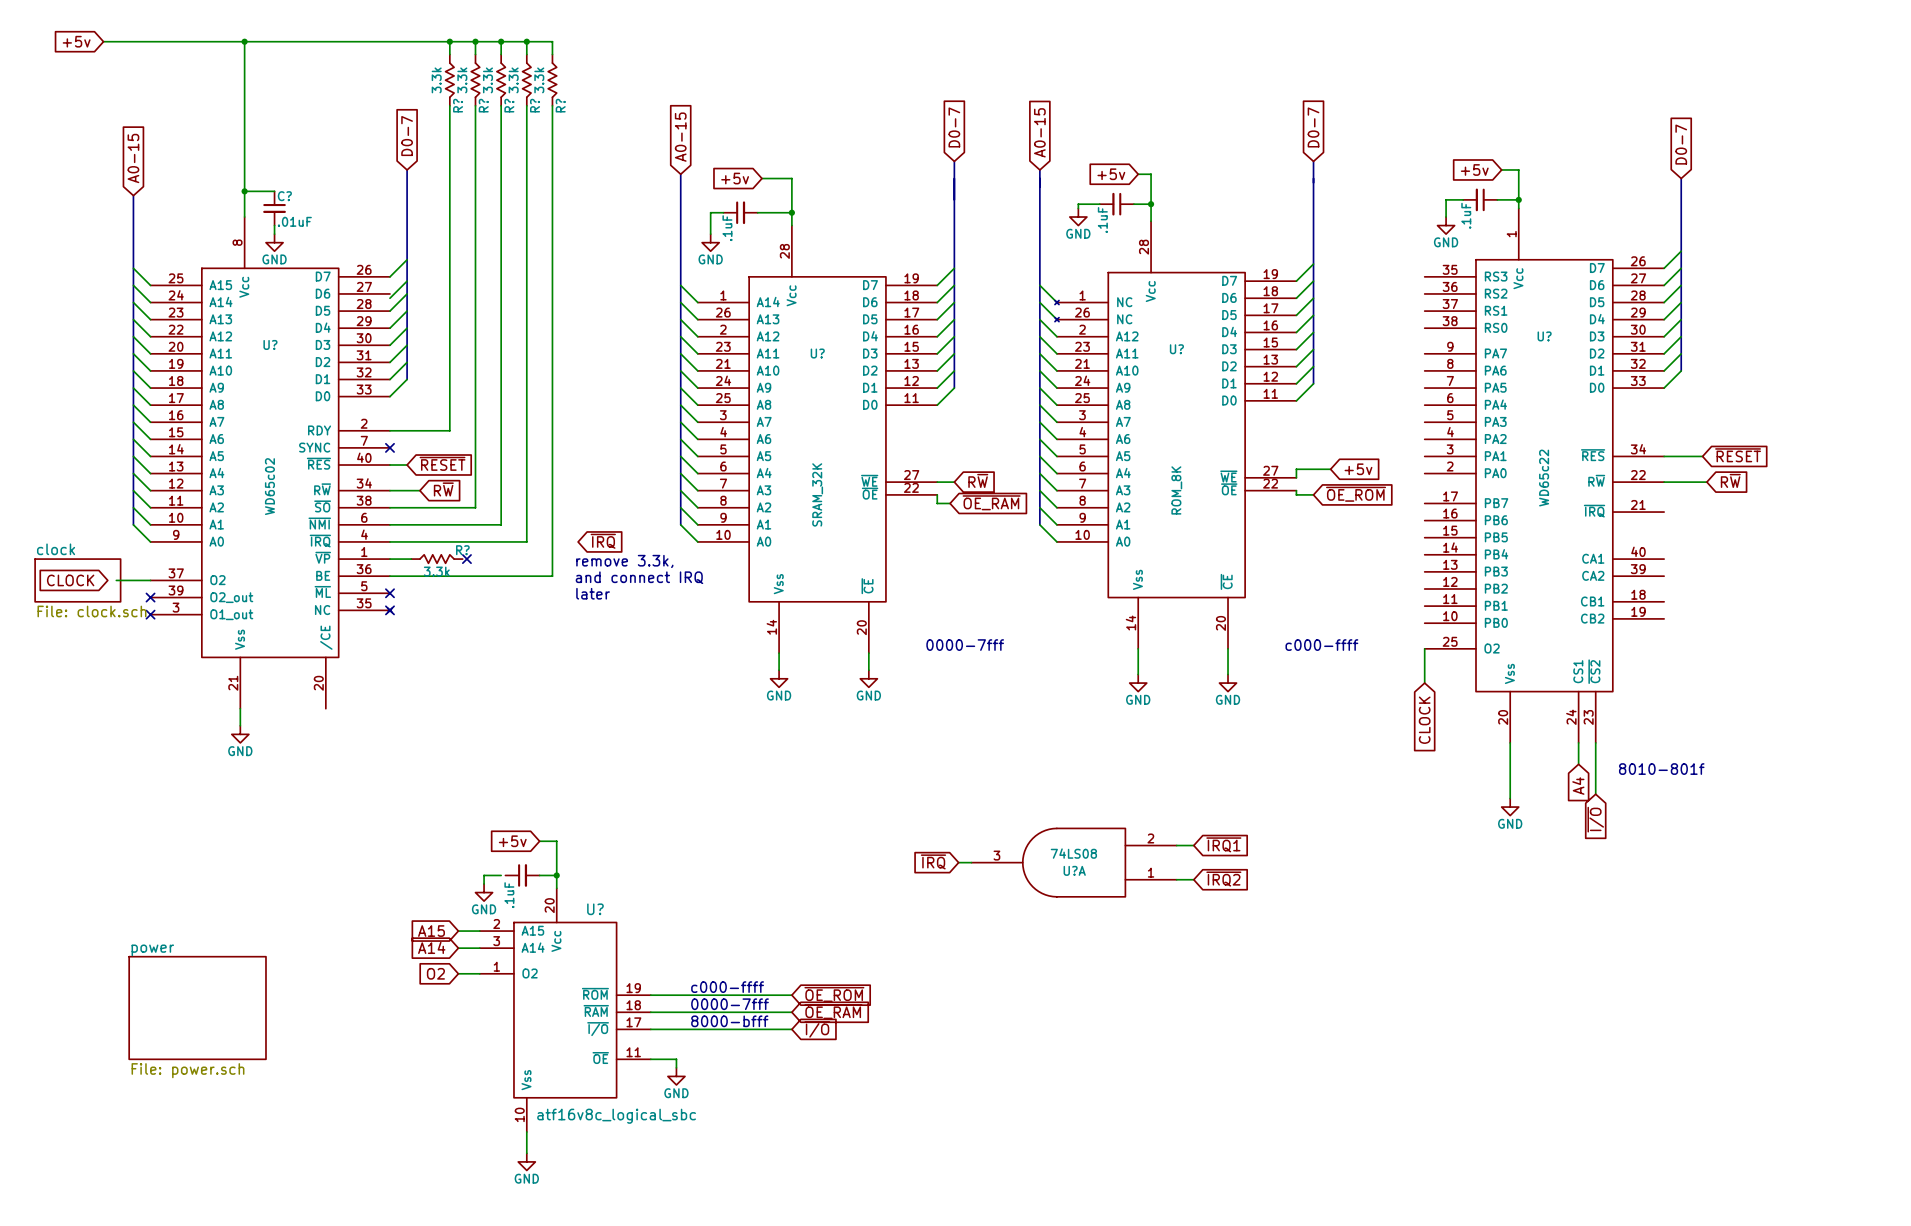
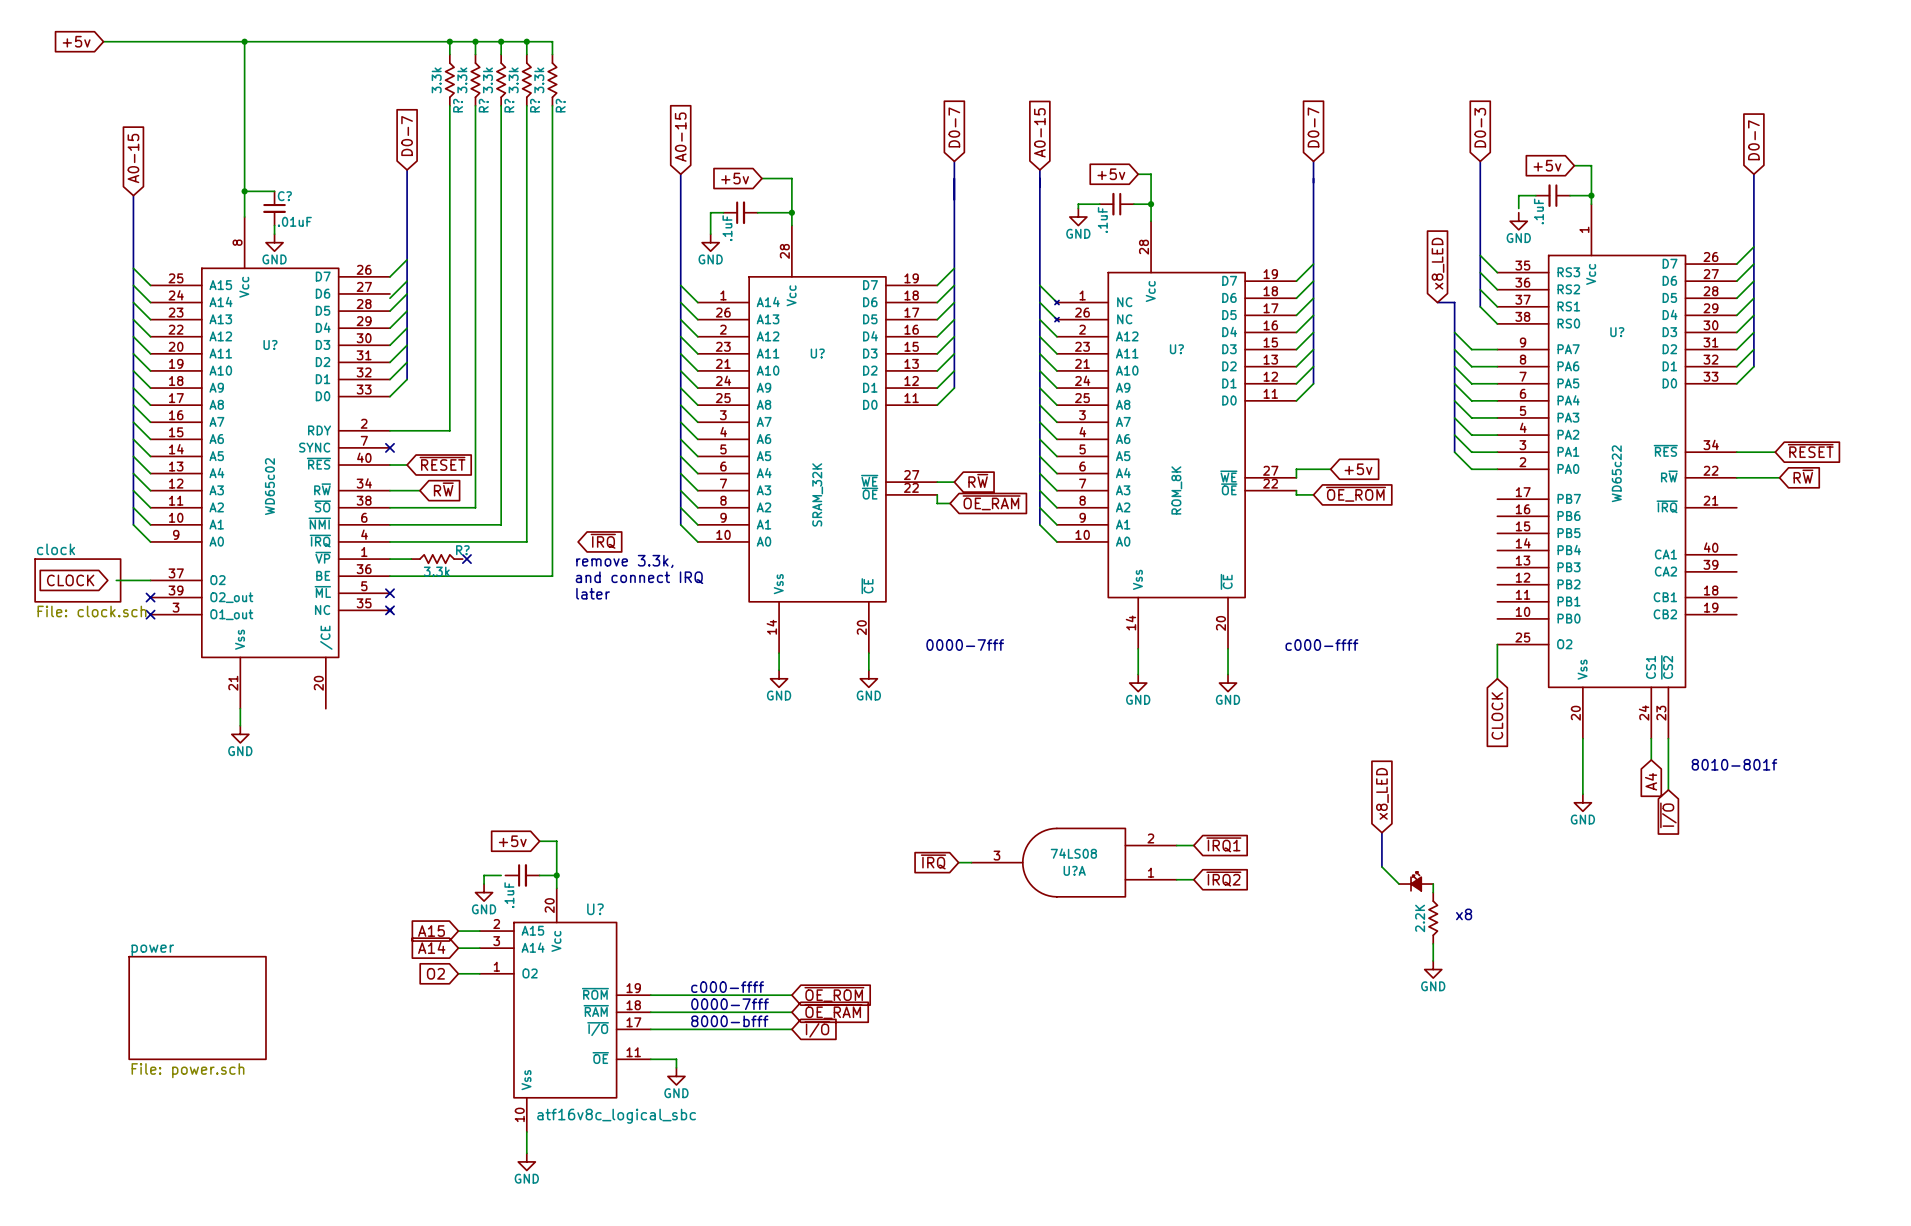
global label: none -> D0-3 (1480, 127)
global label position: D0-7 (1681, 144) -> D0-7 (1753, 140)
bus: none -> (1480, 161) (1480, 306)
wire: none -> (1574, 165) (1591, 165) (1591, 204)
global label position: +5v (1474, 169) -> +5v (1547, 165)
wire: (1501, 169) (1518, 169) (1518, 195) -> (1535, 195) (1518, 195)
bus: (1681, 178) (1681, 370) -> (1753, 174) (1753, 366)
junction: none -> (1591, 195)
wire: (1463, 199) (1446, 199) (1446, 217) -> none
part position: (1480, 199) -> (1552, 195)
wire: (1497, 199) (1518, 199) -> (1570, 195) (1591, 195)
junction: (1518, 199) -> none
power symbol position: GND (1446, 225) -> GND (1518, 221)
wire: (1681, 251) (1664, 268) -> (1753, 246) (1736, 264)
wire: none -> (1480, 255) (1497, 272)
global label: none -> x8_LED (1438, 263)
wire: (1681, 268) (1664, 285) -> (1753, 264) (1736, 281)
wire: none -> (1480, 272) (1497, 289)
wire: (1681, 285) (1664, 302) -> (1753, 281) (1736, 298)
wire: none -> (1480, 289) (1497, 306)
bus: none -> (1437, 302) (1454, 302) (1454, 452)
wire: (1681, 302) (1664, 319) -> (1753, 298) (1736, 315)
wire: none -> (1480, 306) (1497, 323)
wire: (1681, 319) (1664, 336) -> (1753, 315) (1736, 332)
wire: none -> (1454, 332) (1471, 349) (1497, 349)
wire: (1681, 336) (1664, 353) -> (1753, 332) (1736, 349)
wire: none -> (1454, 349) (1471, 366) (1497, 366)
wire: (1681, 353) (1664, 370) -> (1753, 349) (1736, 366)
wire: none -> (1454, 366) (1471, 383) (1497, 383)
wire: (1681, 370) (1664, 388) -> (1753, 366) (1736, 383)
wire: none -> (1454, 383) (1471, 400) (1497, 400)
wire: none -> (1454, 400) (1471, 417) (1497, 417)
wire: none -> (1454, 417) (1471, 435) (1497, 435)
wire: none -> (1454, 435) (1471, 452) (1497, 452)
wire: none -> (1454, 452) (1471, 469) (1497, 469)
global label position: ~{RESET} (1738, 455) -> ~{RESET} (1810, 450)
wire: (1664, 456) (1702, 456) -> (1736, 452) (1775, 452)
U? position: (1544, 475) -> (1617, 471)
global label position: R~{W} (1730, 480) -> R~{W} (1803, 476)
wire: (1664, 482) (1706, 482) -> (1736, 477) (1779, 477)
wire: (1424, 648) (1424, 683) -> (1497, 644) (1497, 678)
global label position: CLOCK (1424, 720) -> CLOCK (1497, 715)
wire: (1510, 742) (1510, 798) -> (1582, 738) (1582, 794)
wire: (1578, 742) (1578, 764) -> (1651, 738) (1651, 760)
wire: (1595, 742) (1595, 794) -> (1668, 738) (1668, 789)
text position: 8010-801f (1661, 769) -> 8010-801f (1734, 764)
global label position: A4 (1578, 786) -> A4 (1651, 781)
global label: none -> x8_LED (1382, 793)
power symbol position: GND (1510, 807) -> GND (1582, 802)
global label position: ~{I/O} (1595, 819) -> ~{I/O} (1668, 815)
bus: none -> (1381, 832) (1381, 866)
wire: none -> (1381, 866) (1399, 884)
part: none -> (1416, 881)
wire: none -> (1433, 884) (1433, 892)
text: none -> x8 (1464, 914)
part: none -> 2.2K (1433, 918)
wire: none -> (1433, 943) (1433, 960)
power symbol: none -> GND (1433, 969)

